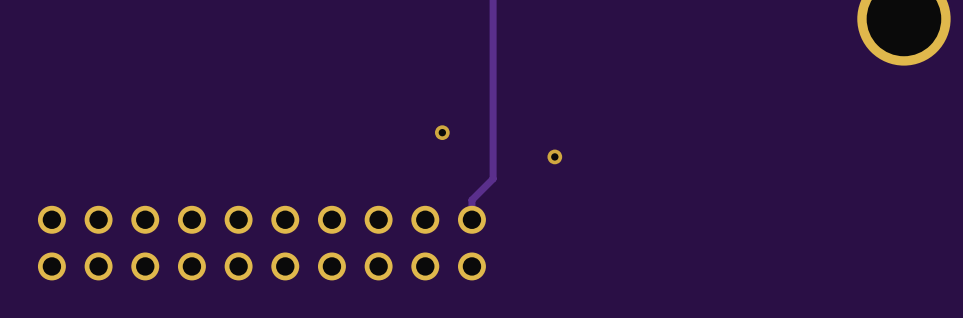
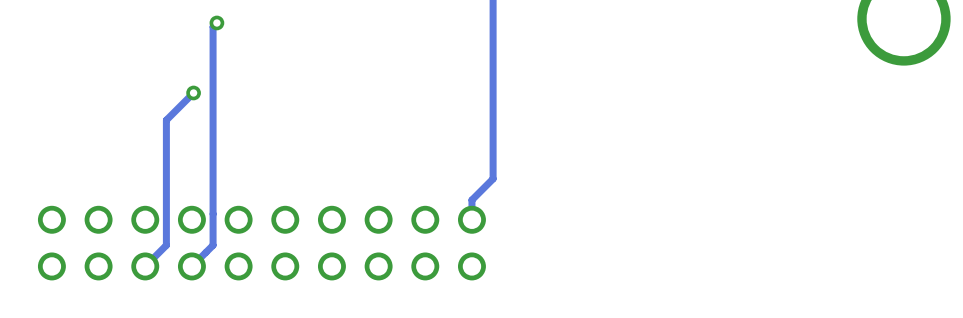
track: none -> (216, 22) (213, 26) (213, 245) (191, 266)
via: none -> (216, 22)
track: none -> (193, 92) (166, 120) (166, 245) (145, 266)
via: none -> (193, 92)
via: (442, 132) -> none
via: (554, 156) -> none

